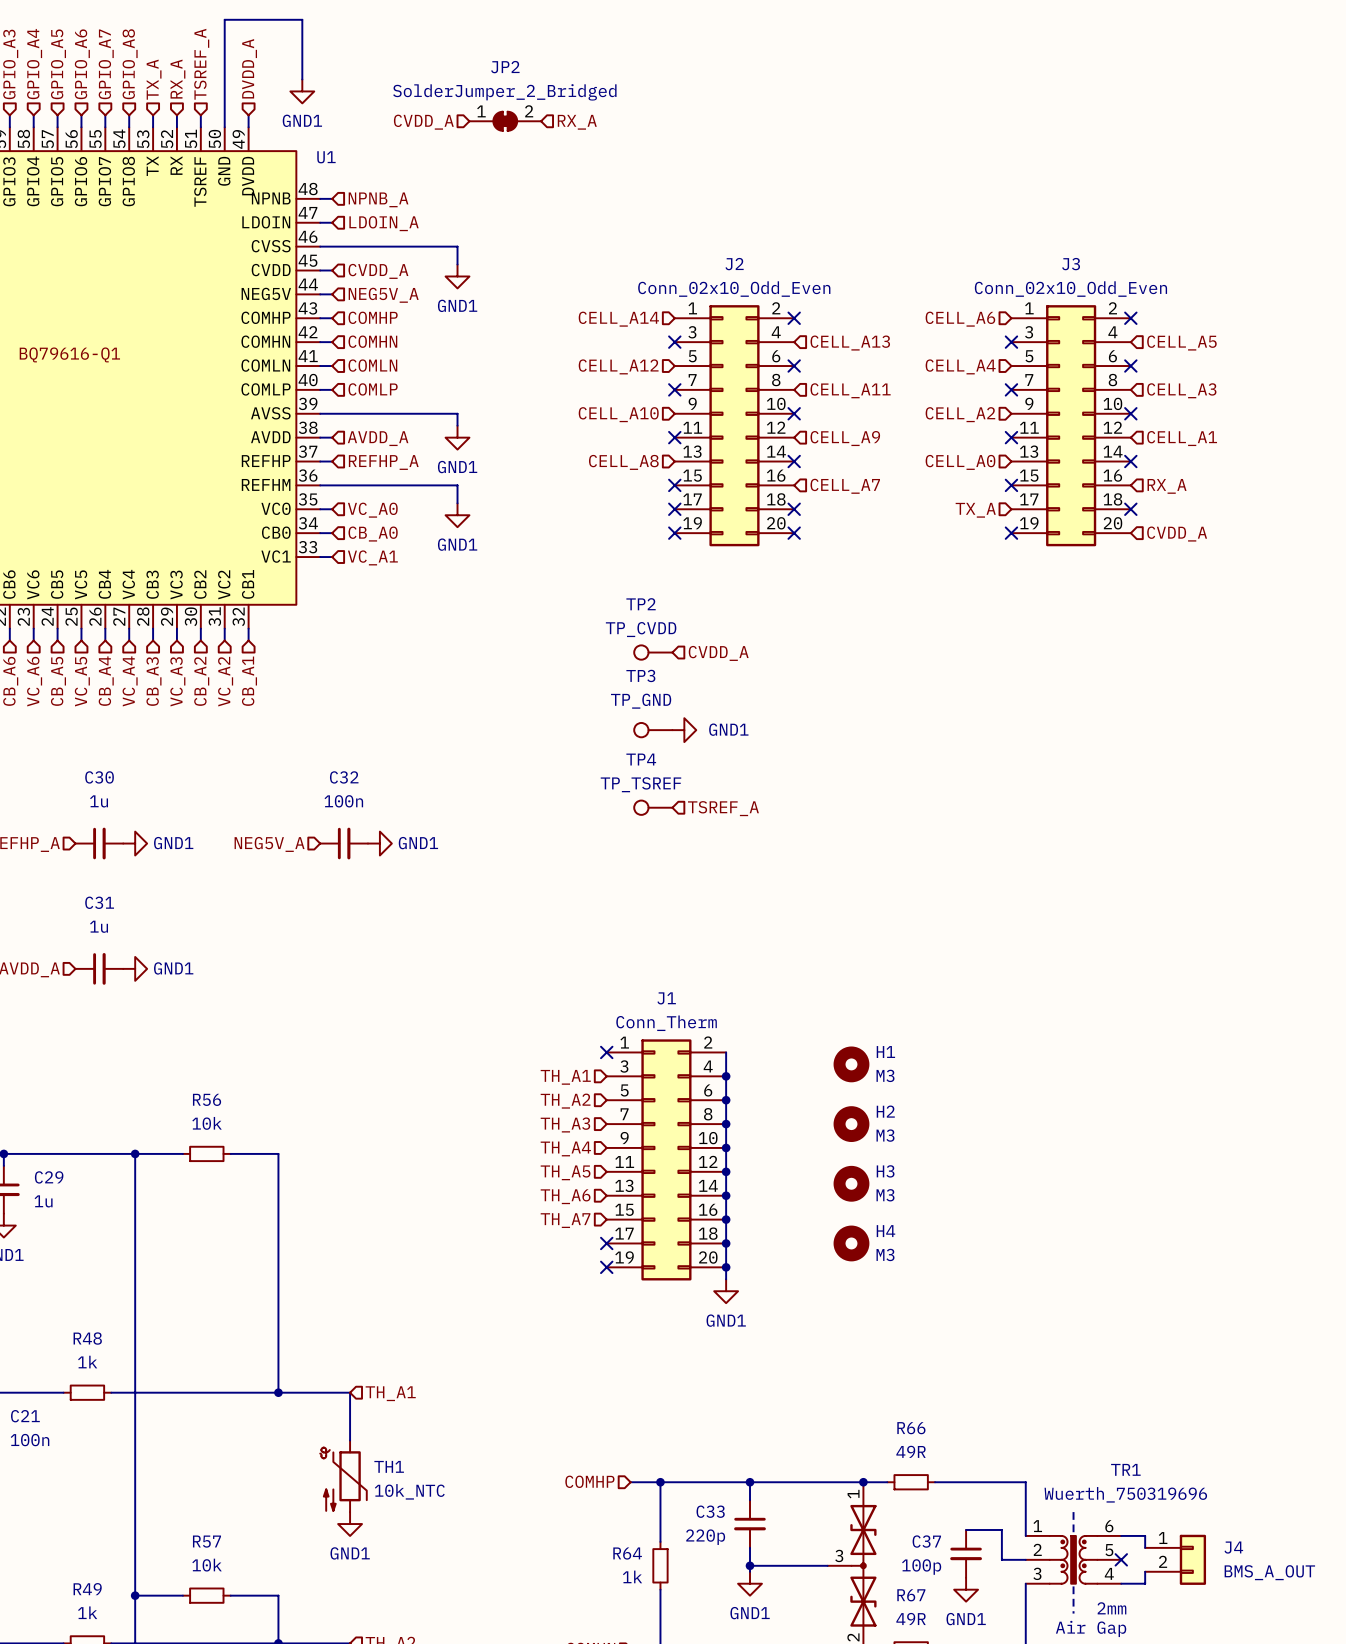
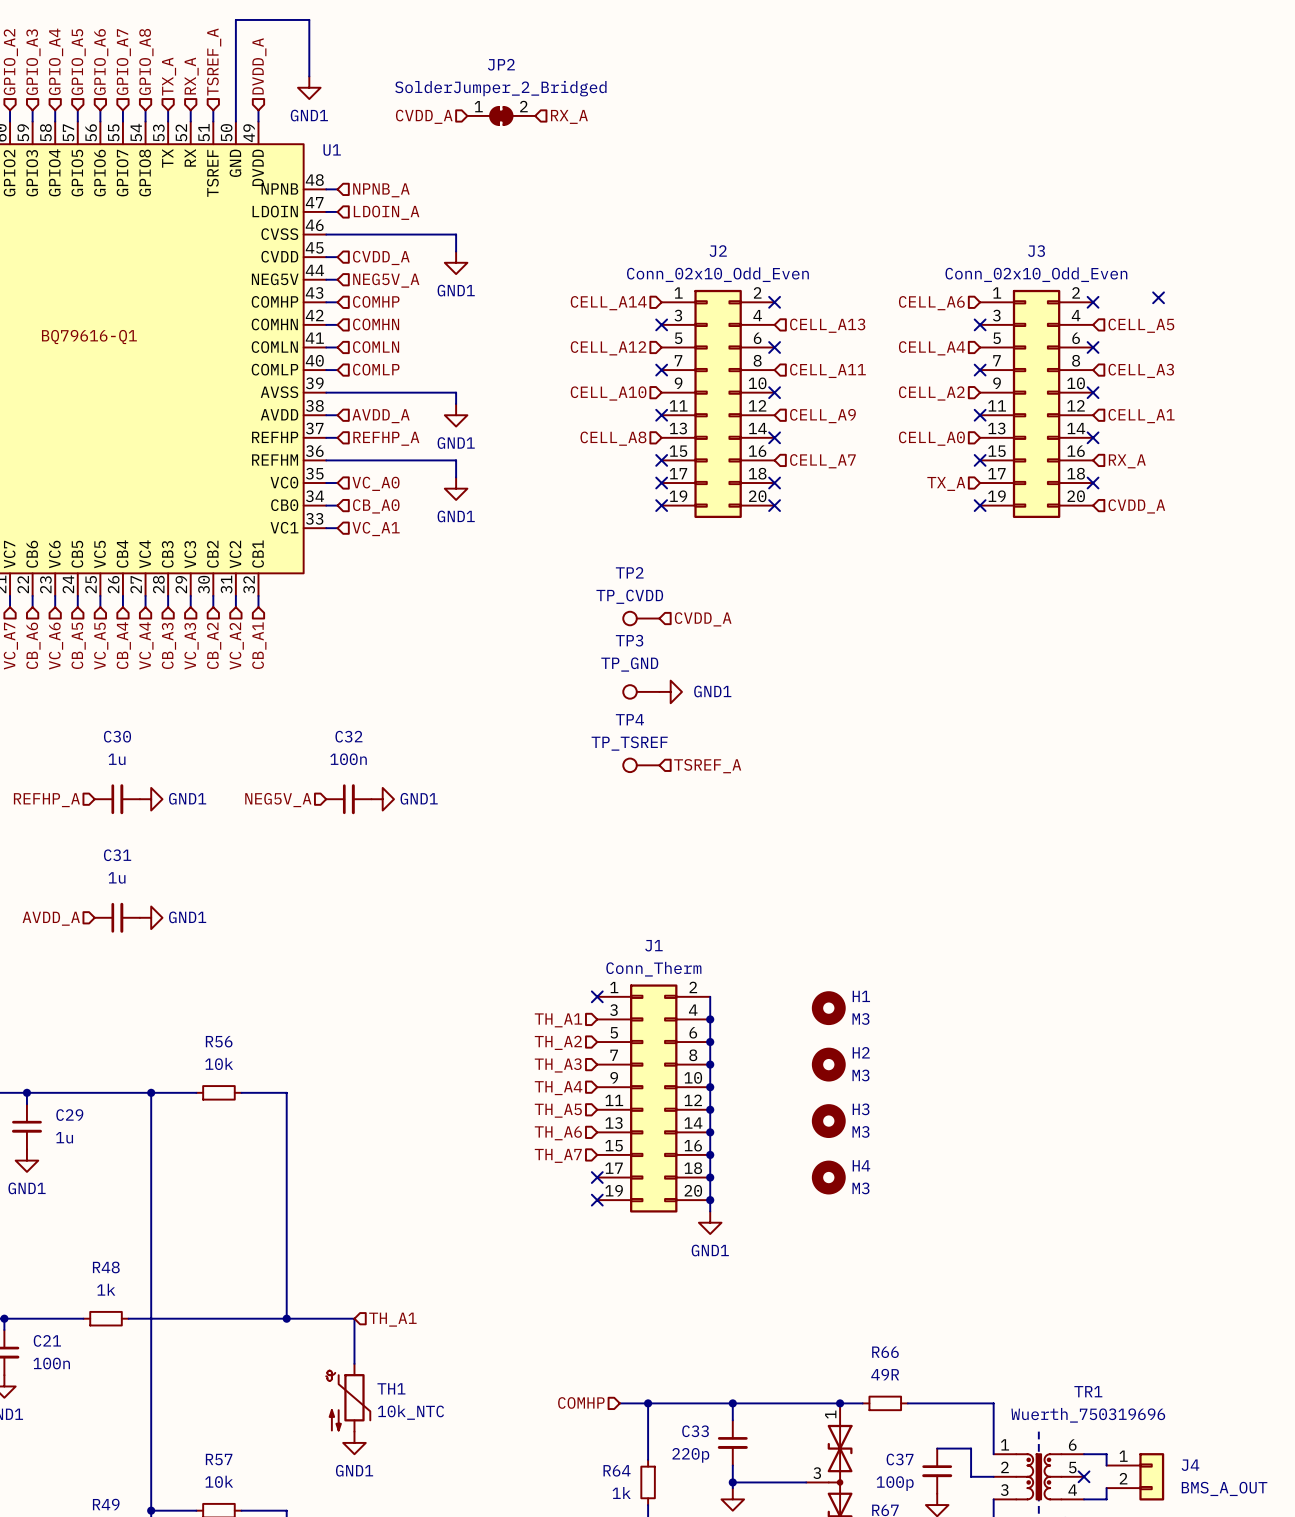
no-connect mark: none -> (1158, 297)

